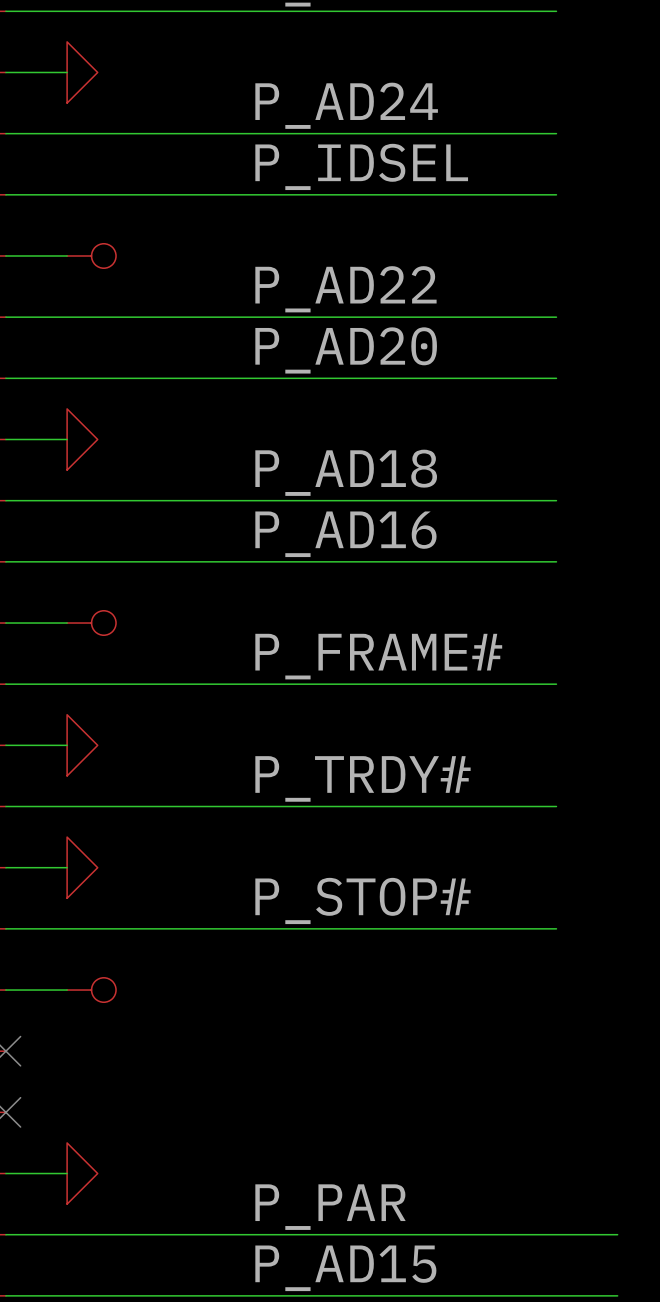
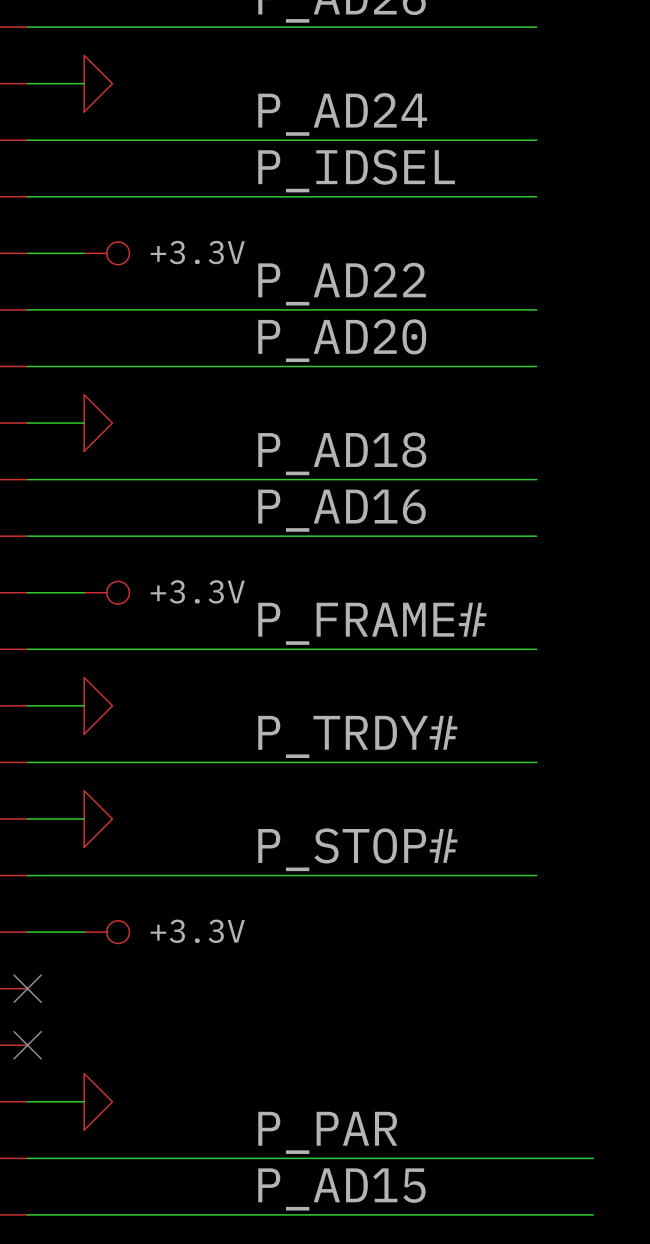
power symbol text: none -> +3.3V (197, 252)
power symbol text: none -> +3.3V (197, 591)
power symbol text: none -> +3.3V (197, 931)

